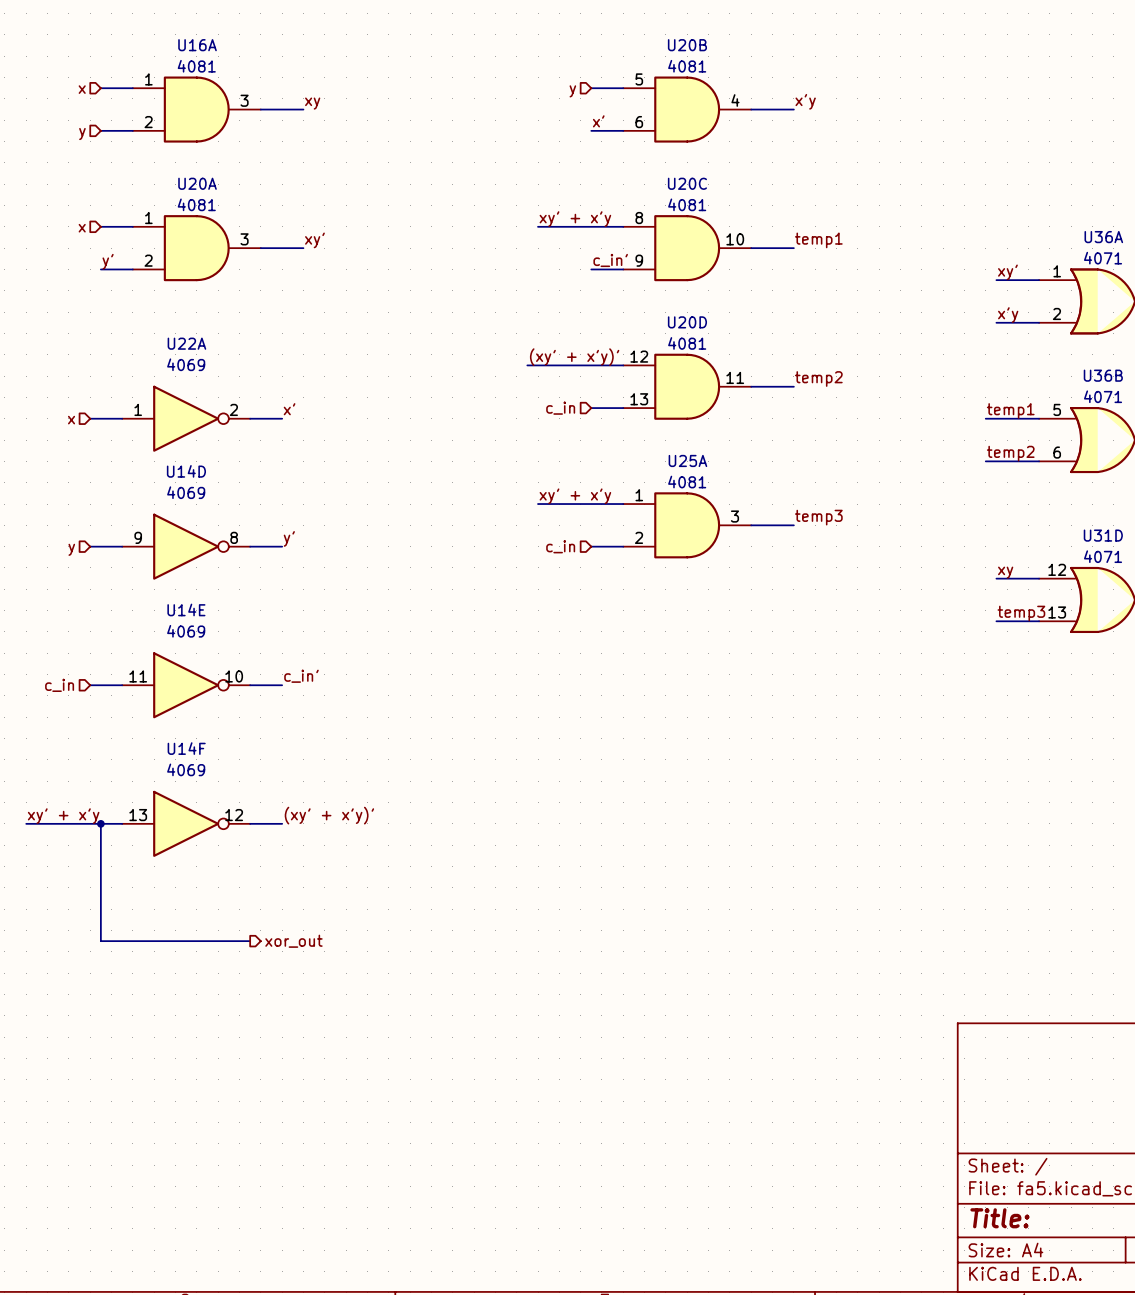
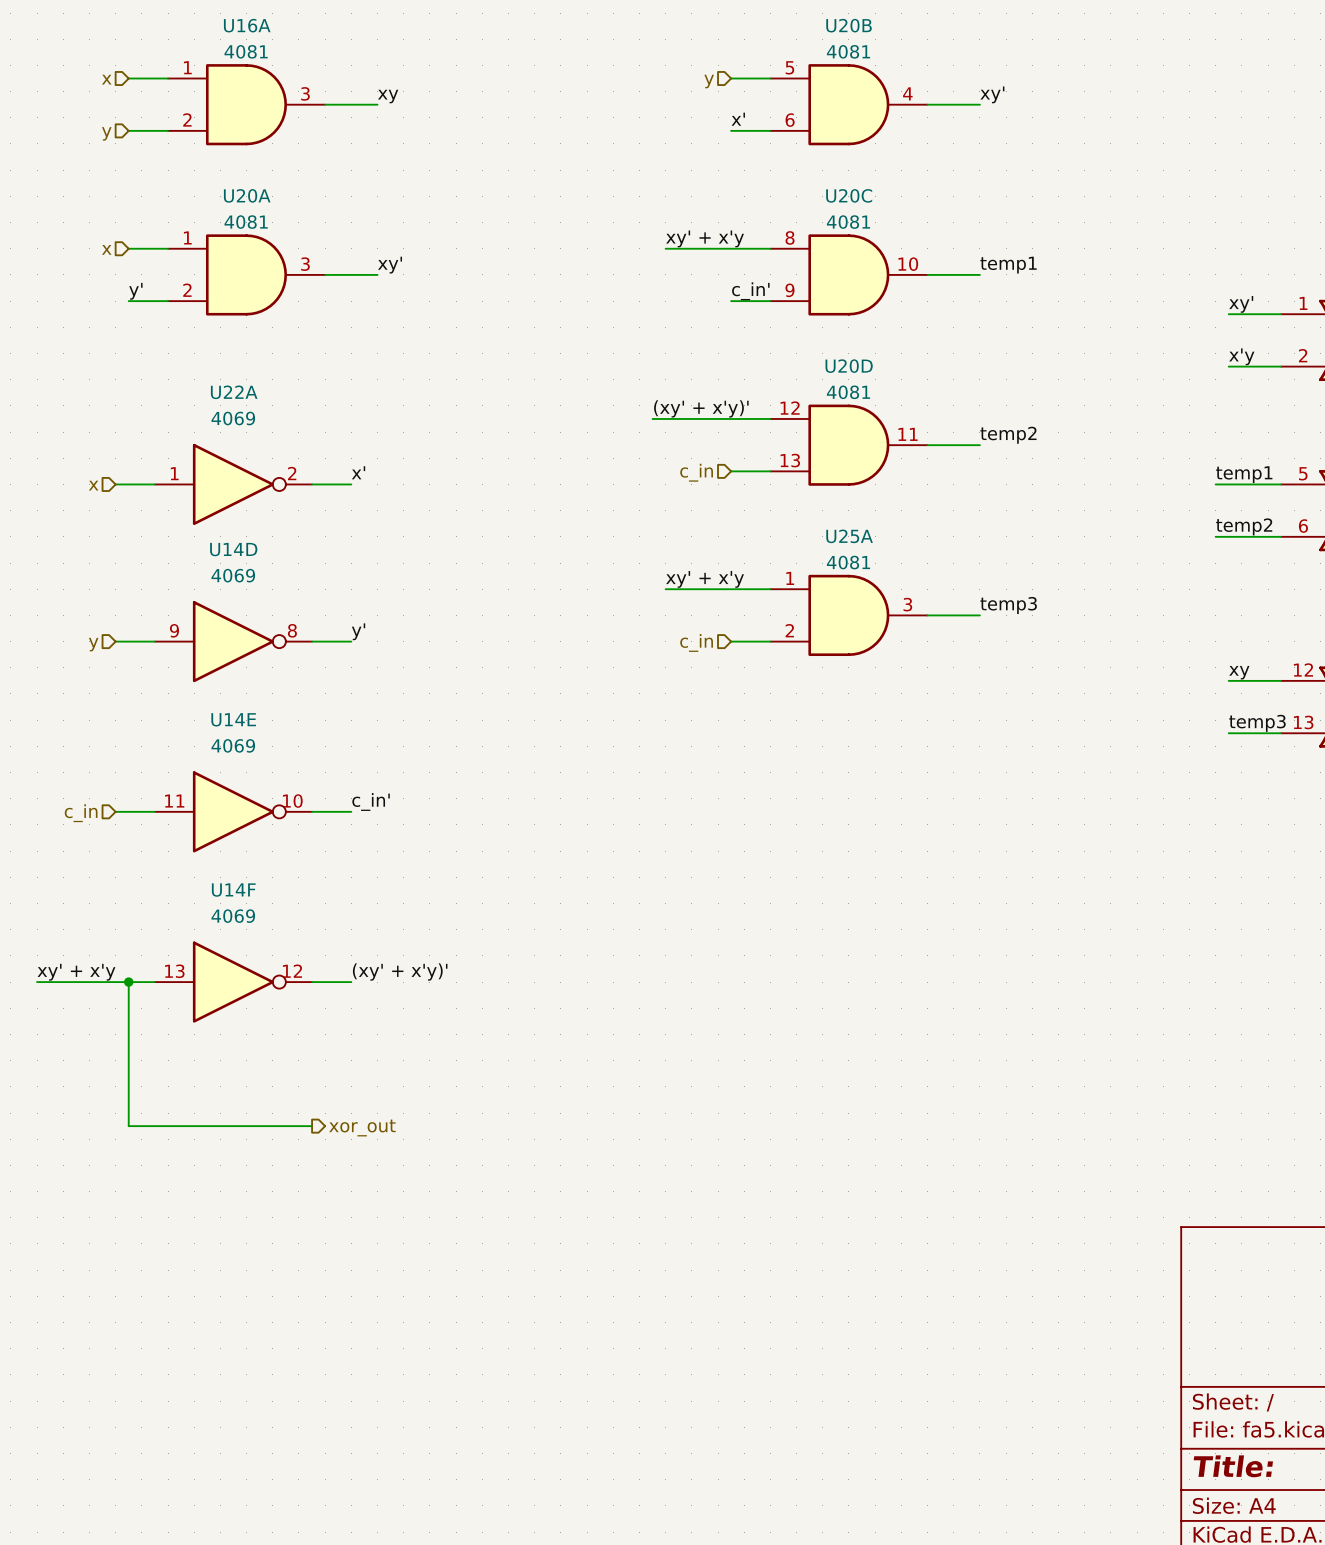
label: x'y (805, 101) -> xy' (992, 94)

